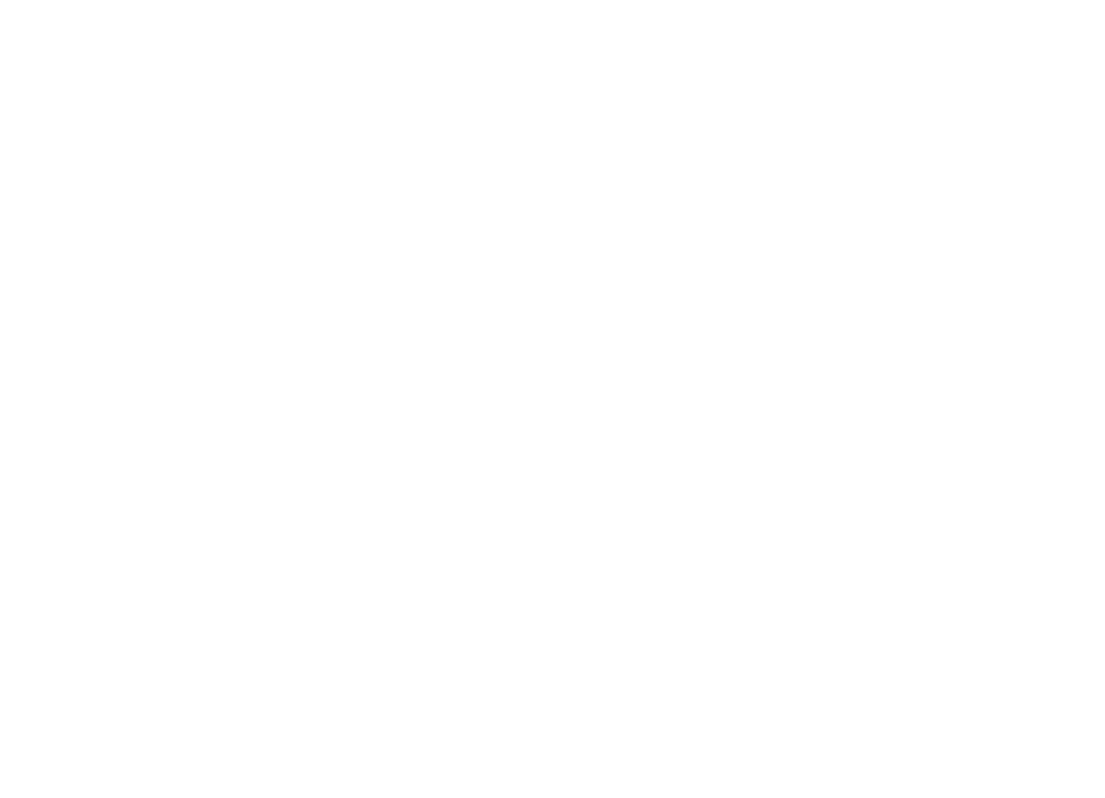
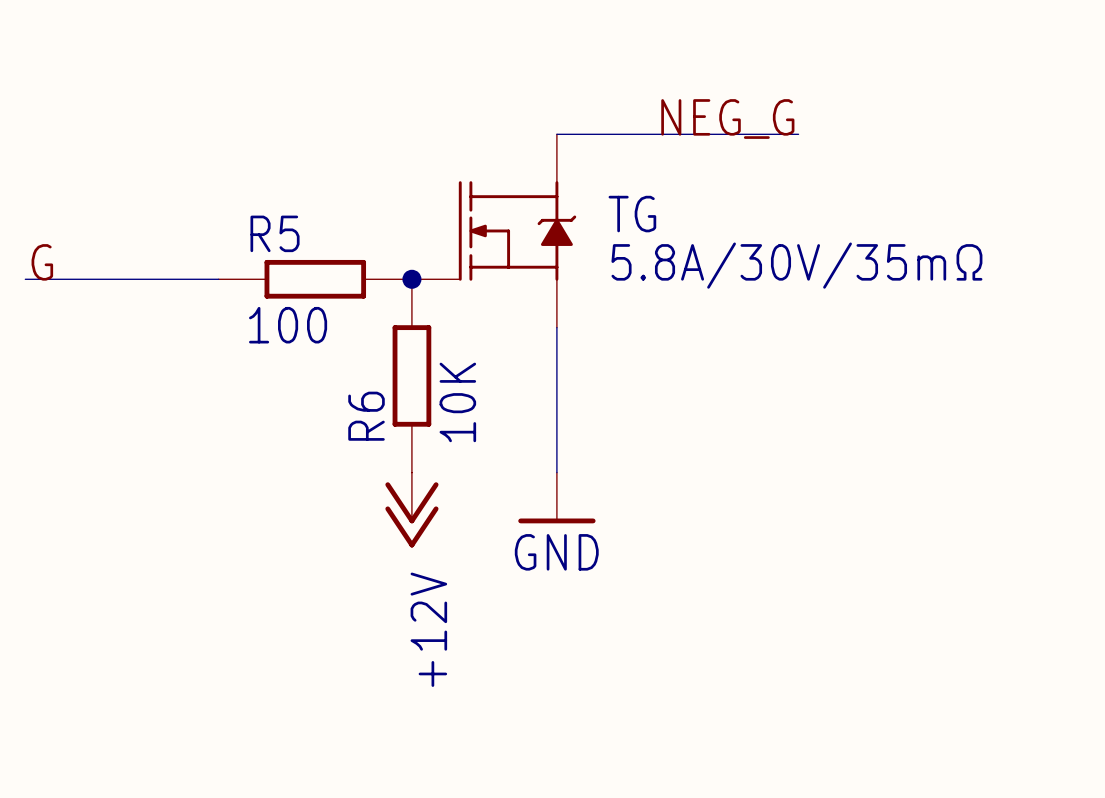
label: none -> NEG_G (727, 119)
wire: none -> (556, 134) (798, 134)
TG: none -> 5.8A/30V/35mΩ (494, 230)
label: none -> G (42, 262)
wire: none -> (25, 279) (218, 279)
R5: none -> 100 (315, 279)
junction: none -> (411, 279)
wire: none -> (556, 327) (556, 472)
R6: none -> 10K (411, 375)
power symbol: none -> GND (556, 497)
power symbol: none -> +12V (411, 510)

